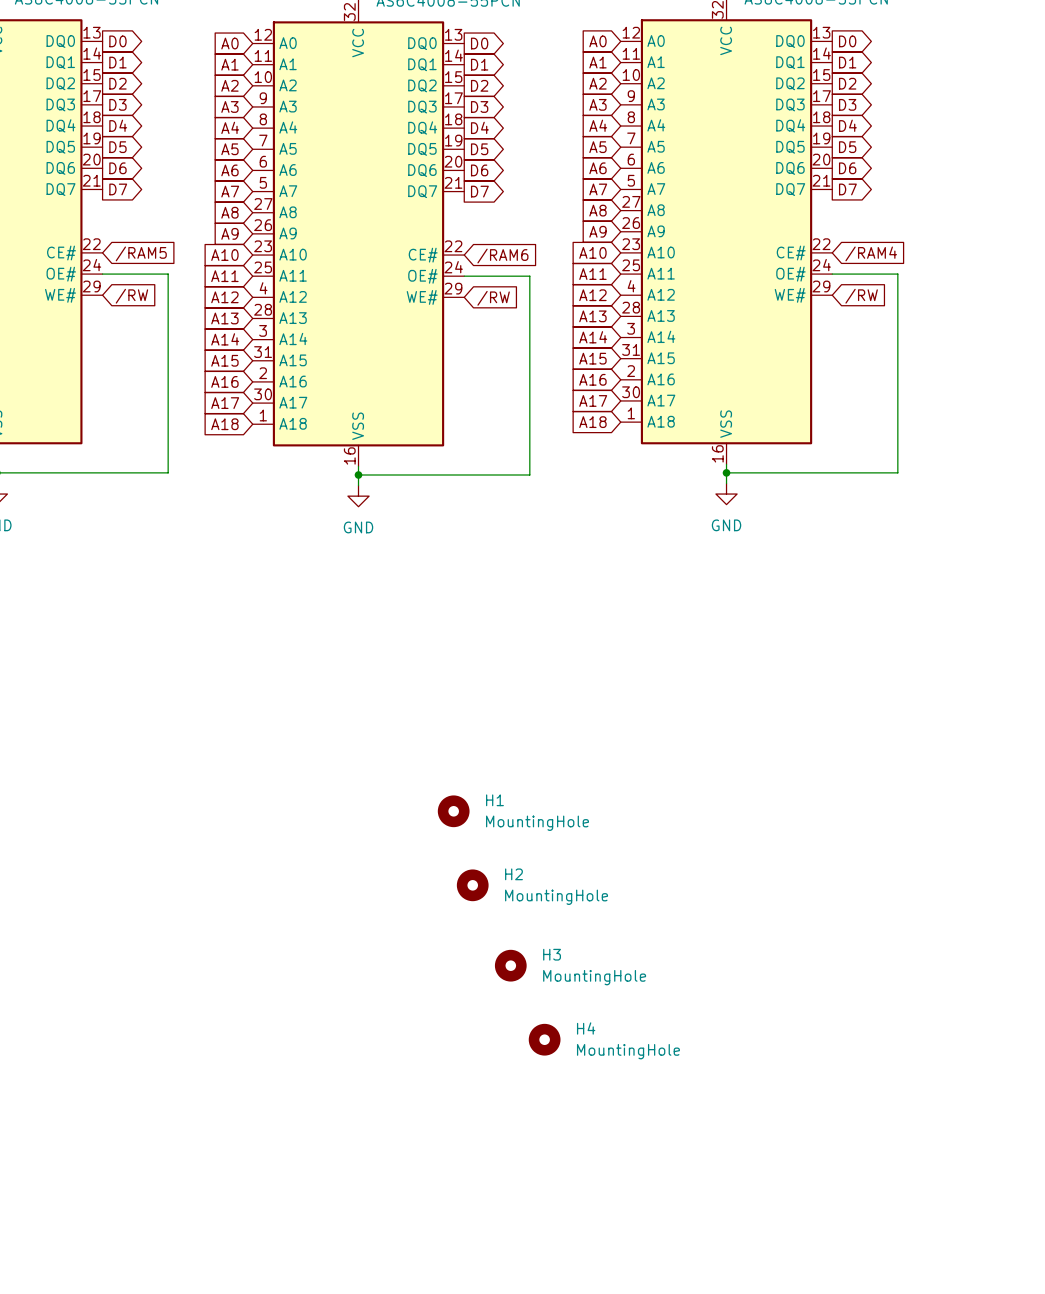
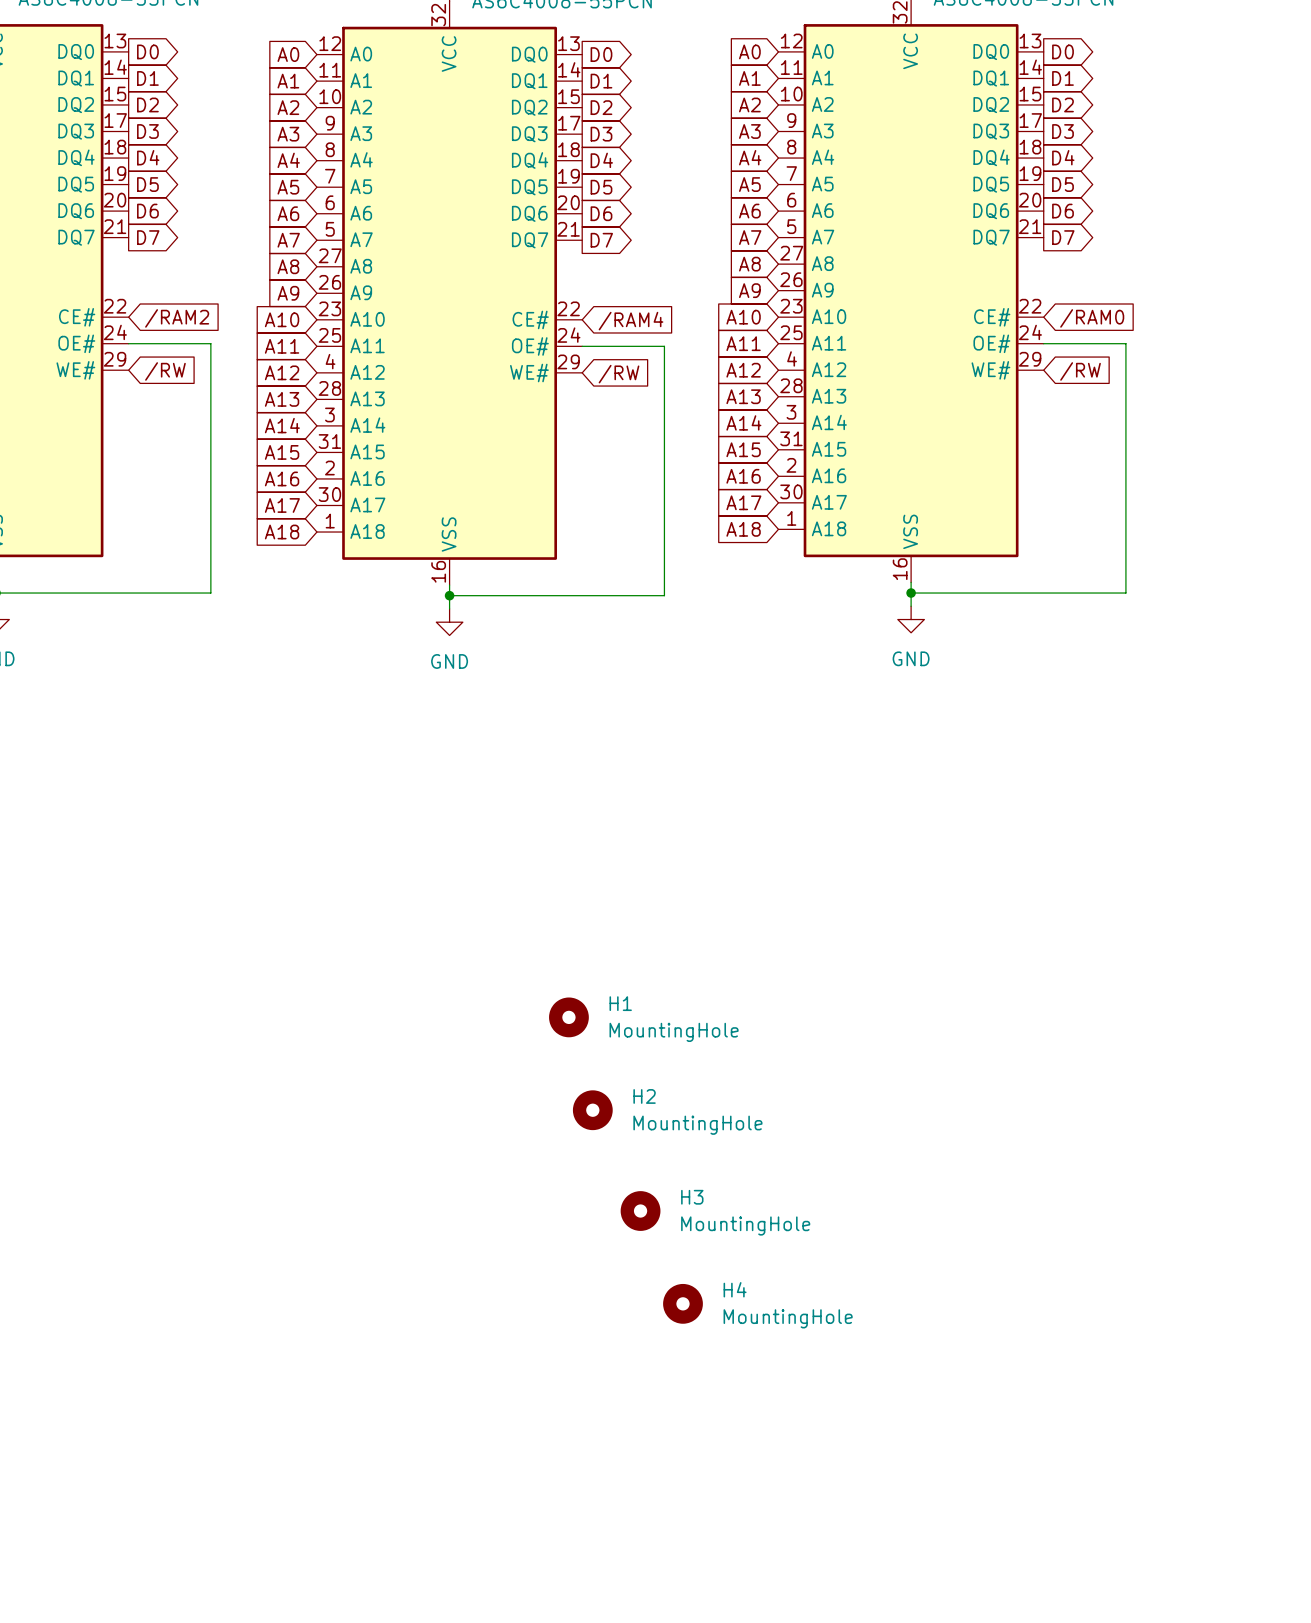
global label: /RAM5 (141, 253) -> /RAM2 (177, 318)
global label: /RAM4 (871, 253) -> /RAM0 (1092, 318)
global label: /RAM6 (502, 256) -> /RAM4 (631, 321)

